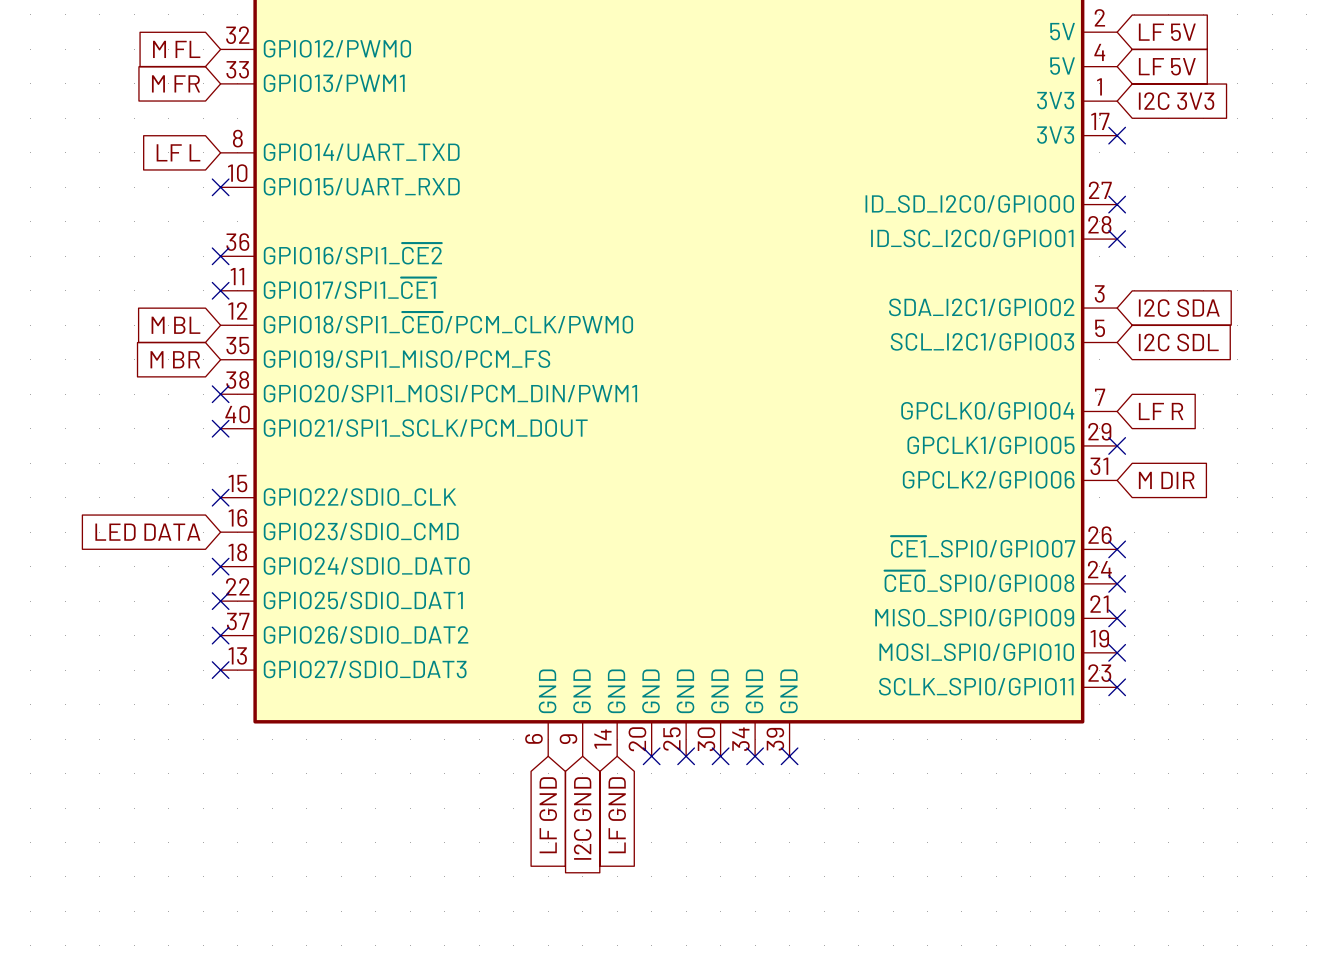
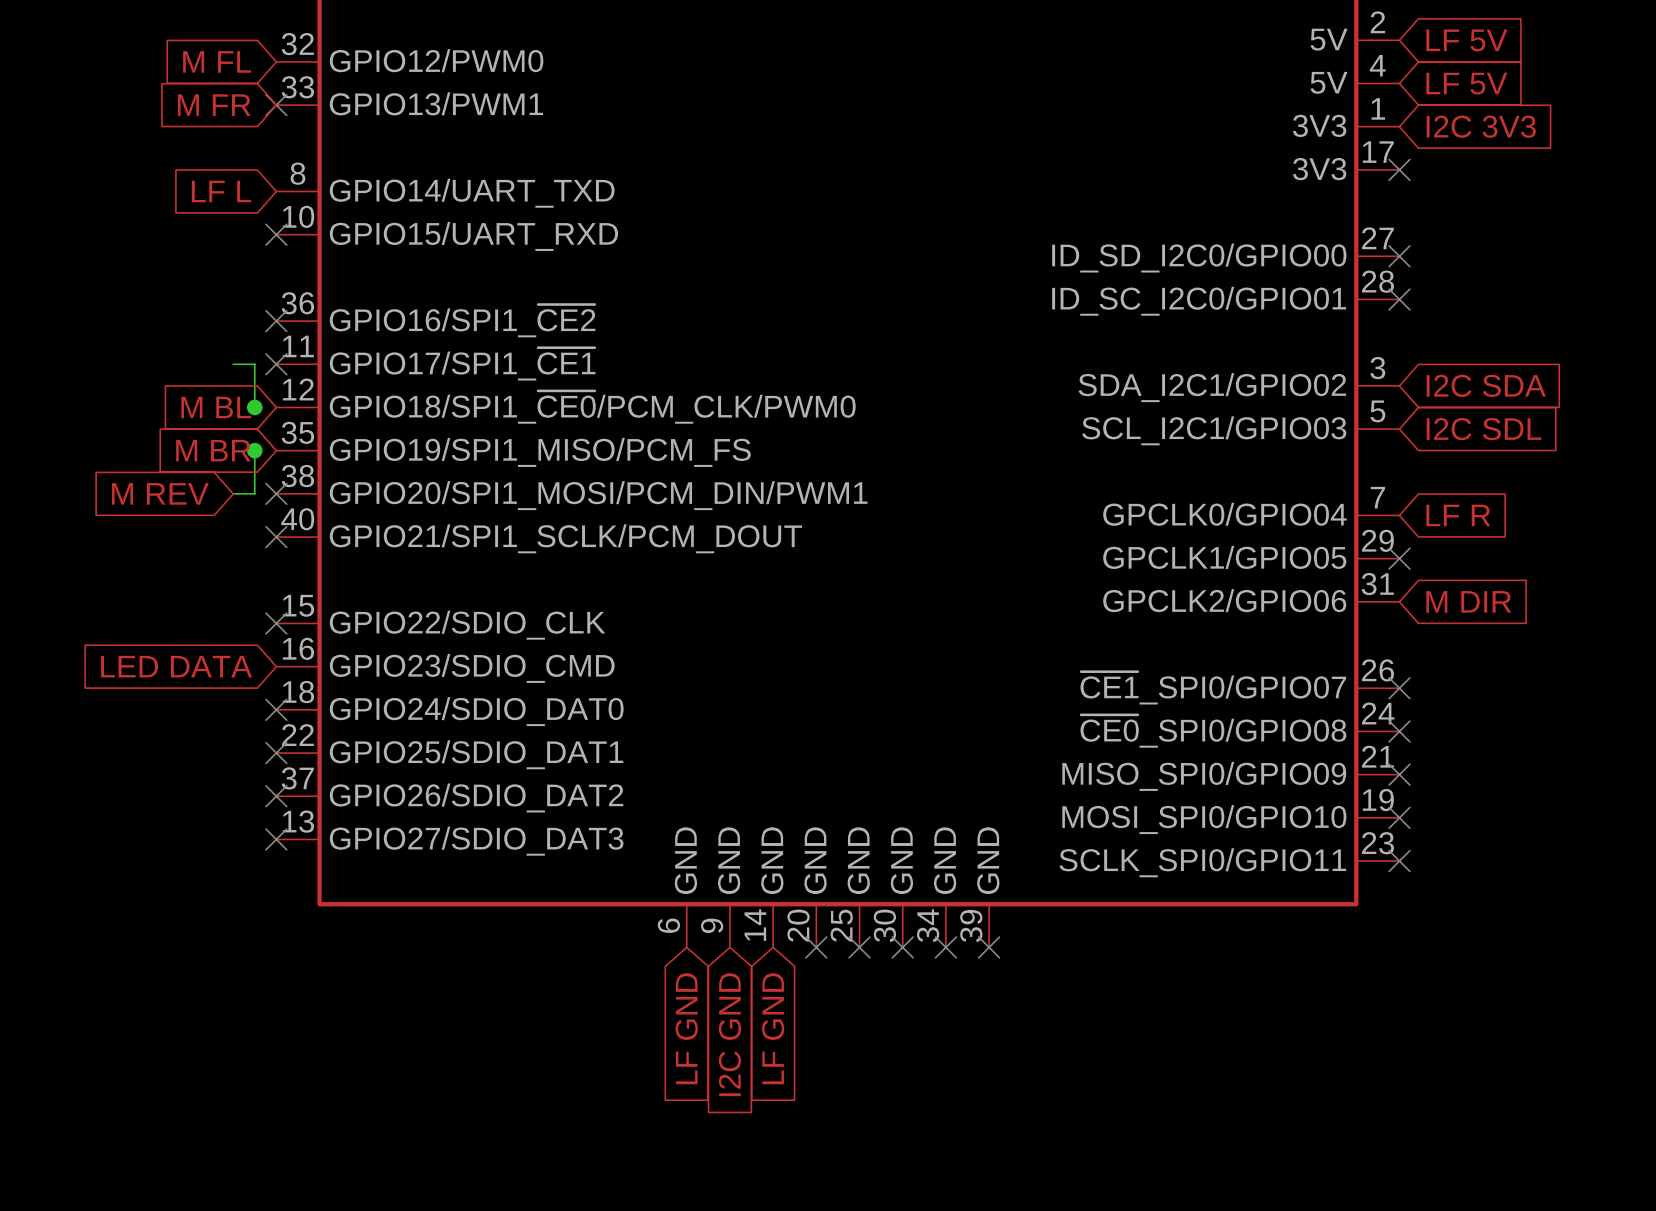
no-connect mark: none -> (276, 105)
wire: none -> (233, 364) (254, 364) (254, 407)
junction: none -> (254, 407)
wire: none -> (254, 450) (254, 493) (233, 493)
junction: none -> (254, 450)
global label: none -> M REV (160, 493)

